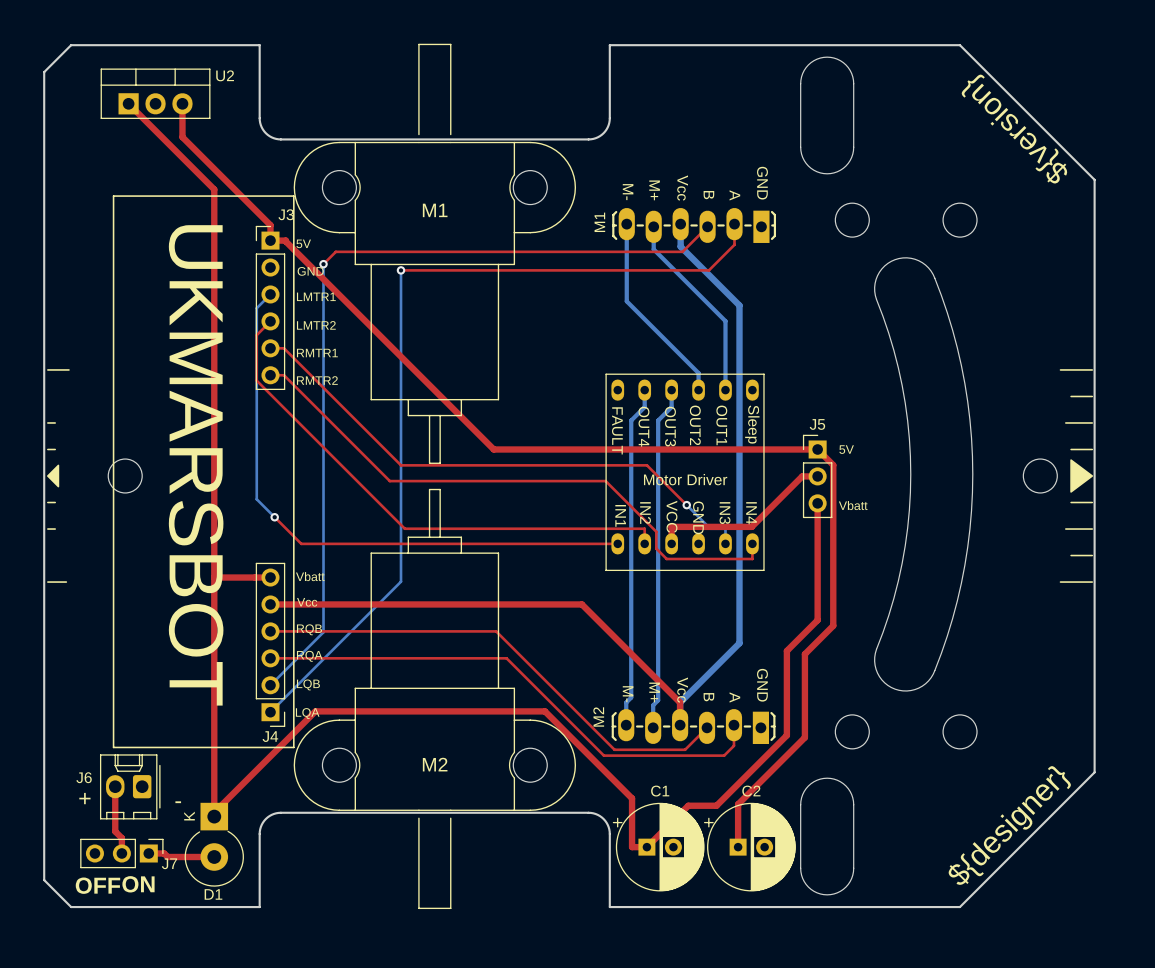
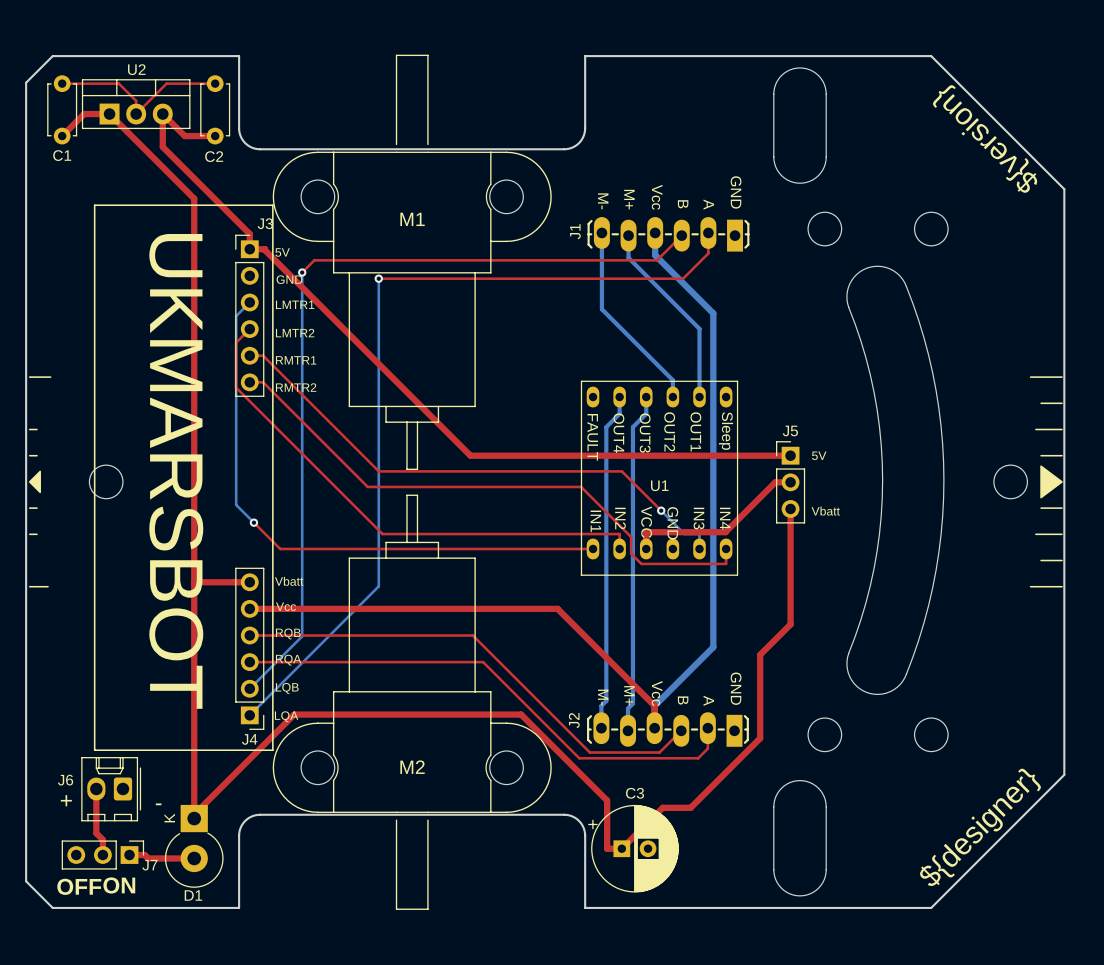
top track: none -> (62, 83) (118, 83) (136, 100) (136, 114) (166, 83) (215, 83)
U2 name position: U2 (225, 75) -> U2 (136, 69)
C1: none -> (62, 109)
top track: none -> (109, 114) (84, 114) (62, 136)
top track: none -> (162, 114) (184, 136) (215, 136)
M1 name: M1 (599, 222) -> J1 (575, 231)
top track: (817, 449) (833, 465) (833, 625) (804, 654) (804, 737) (738, 804) (738, 847) -> none
Motor Driver name: Motor Driver (685, 479) -> U1 (659, 485)
M2 name: M2 (598, 716) -> J2 (574, 720)
C1 name: C1 (660, 791) -> C3 (634, 793)
C2 name position: C2 (751, 791) -> C2 (214, 156)
C2 footprint: [703, 802, 796, 892] -> [200, 75, 231, 145]

